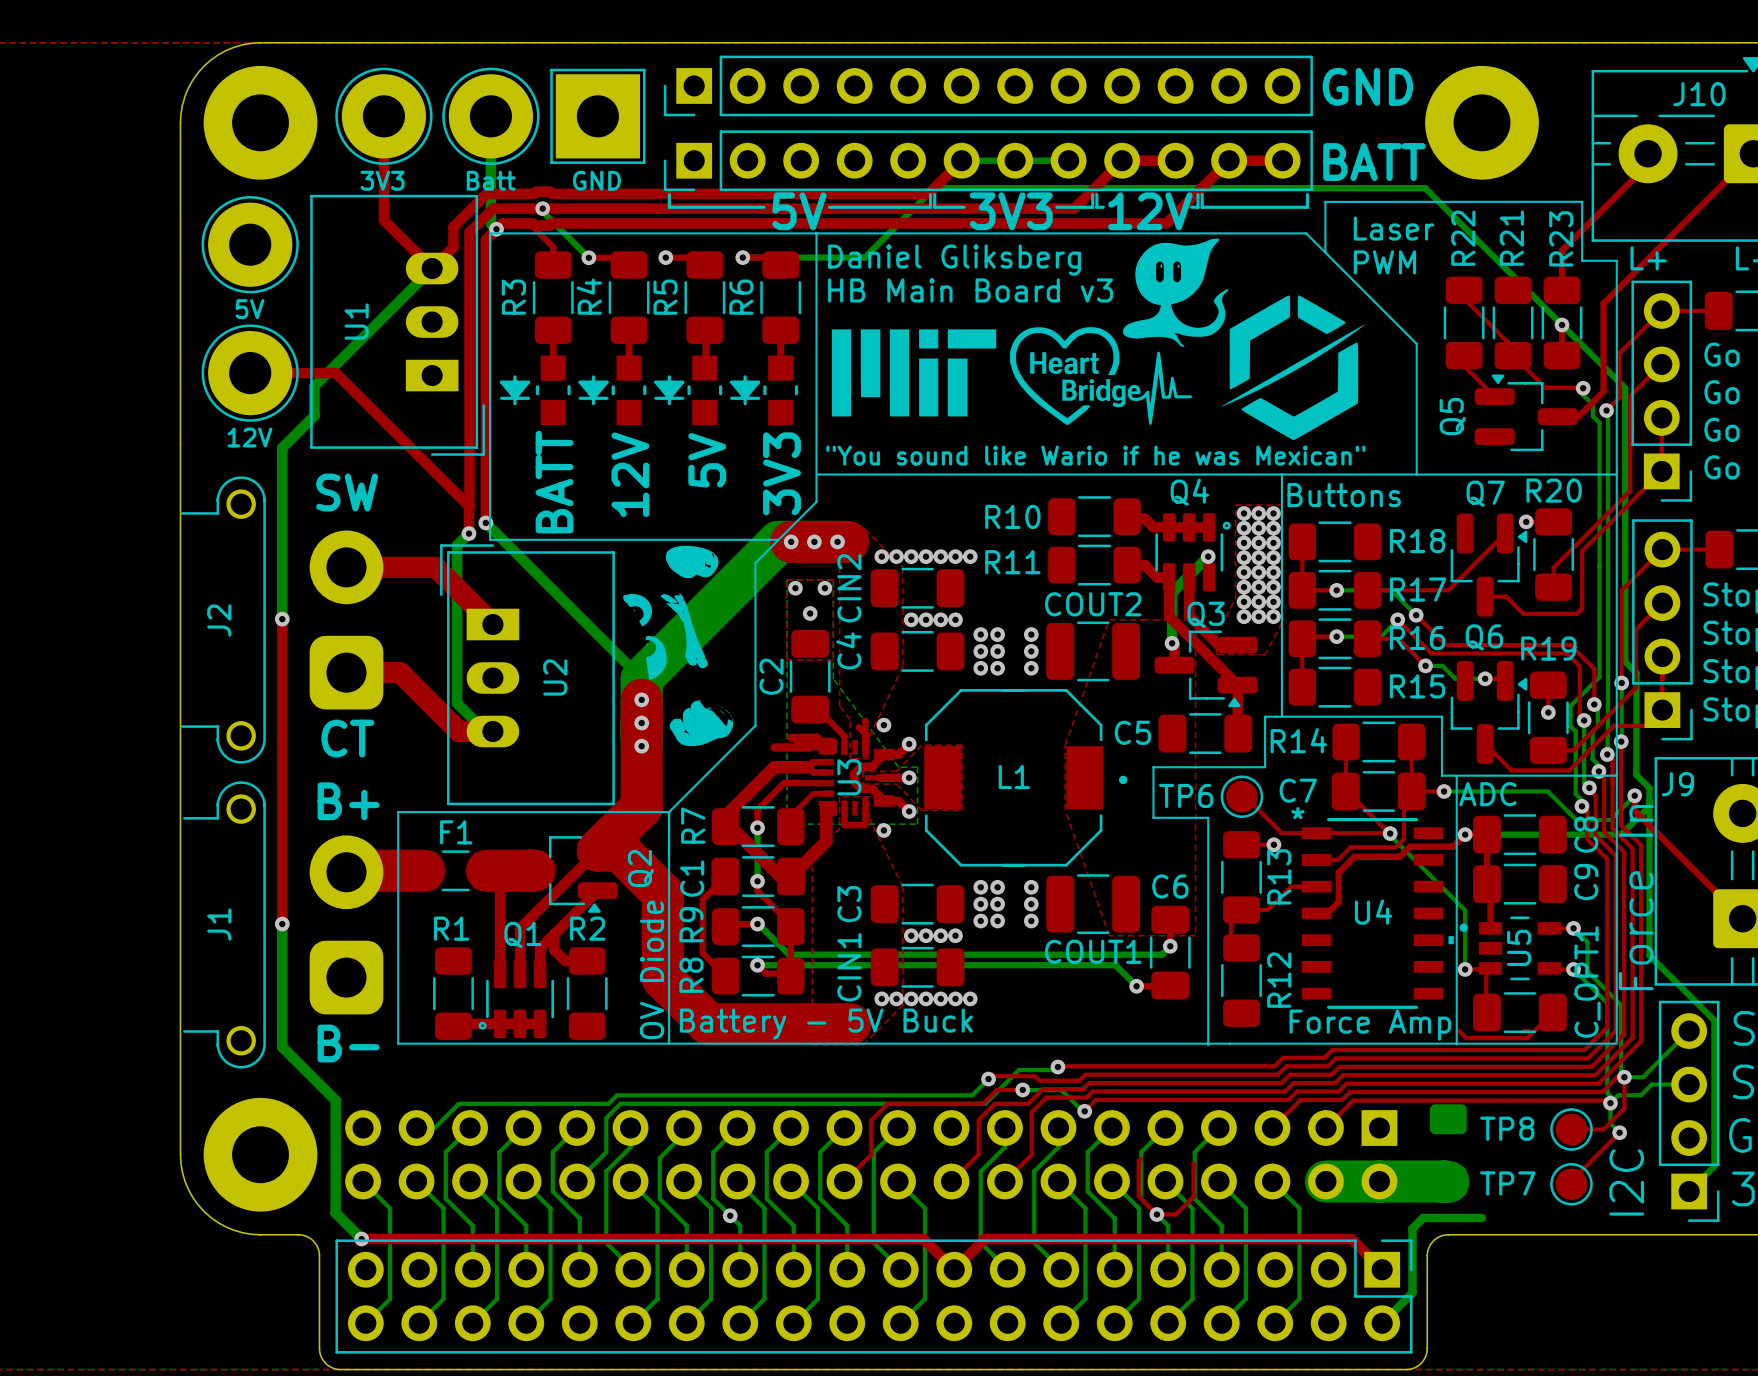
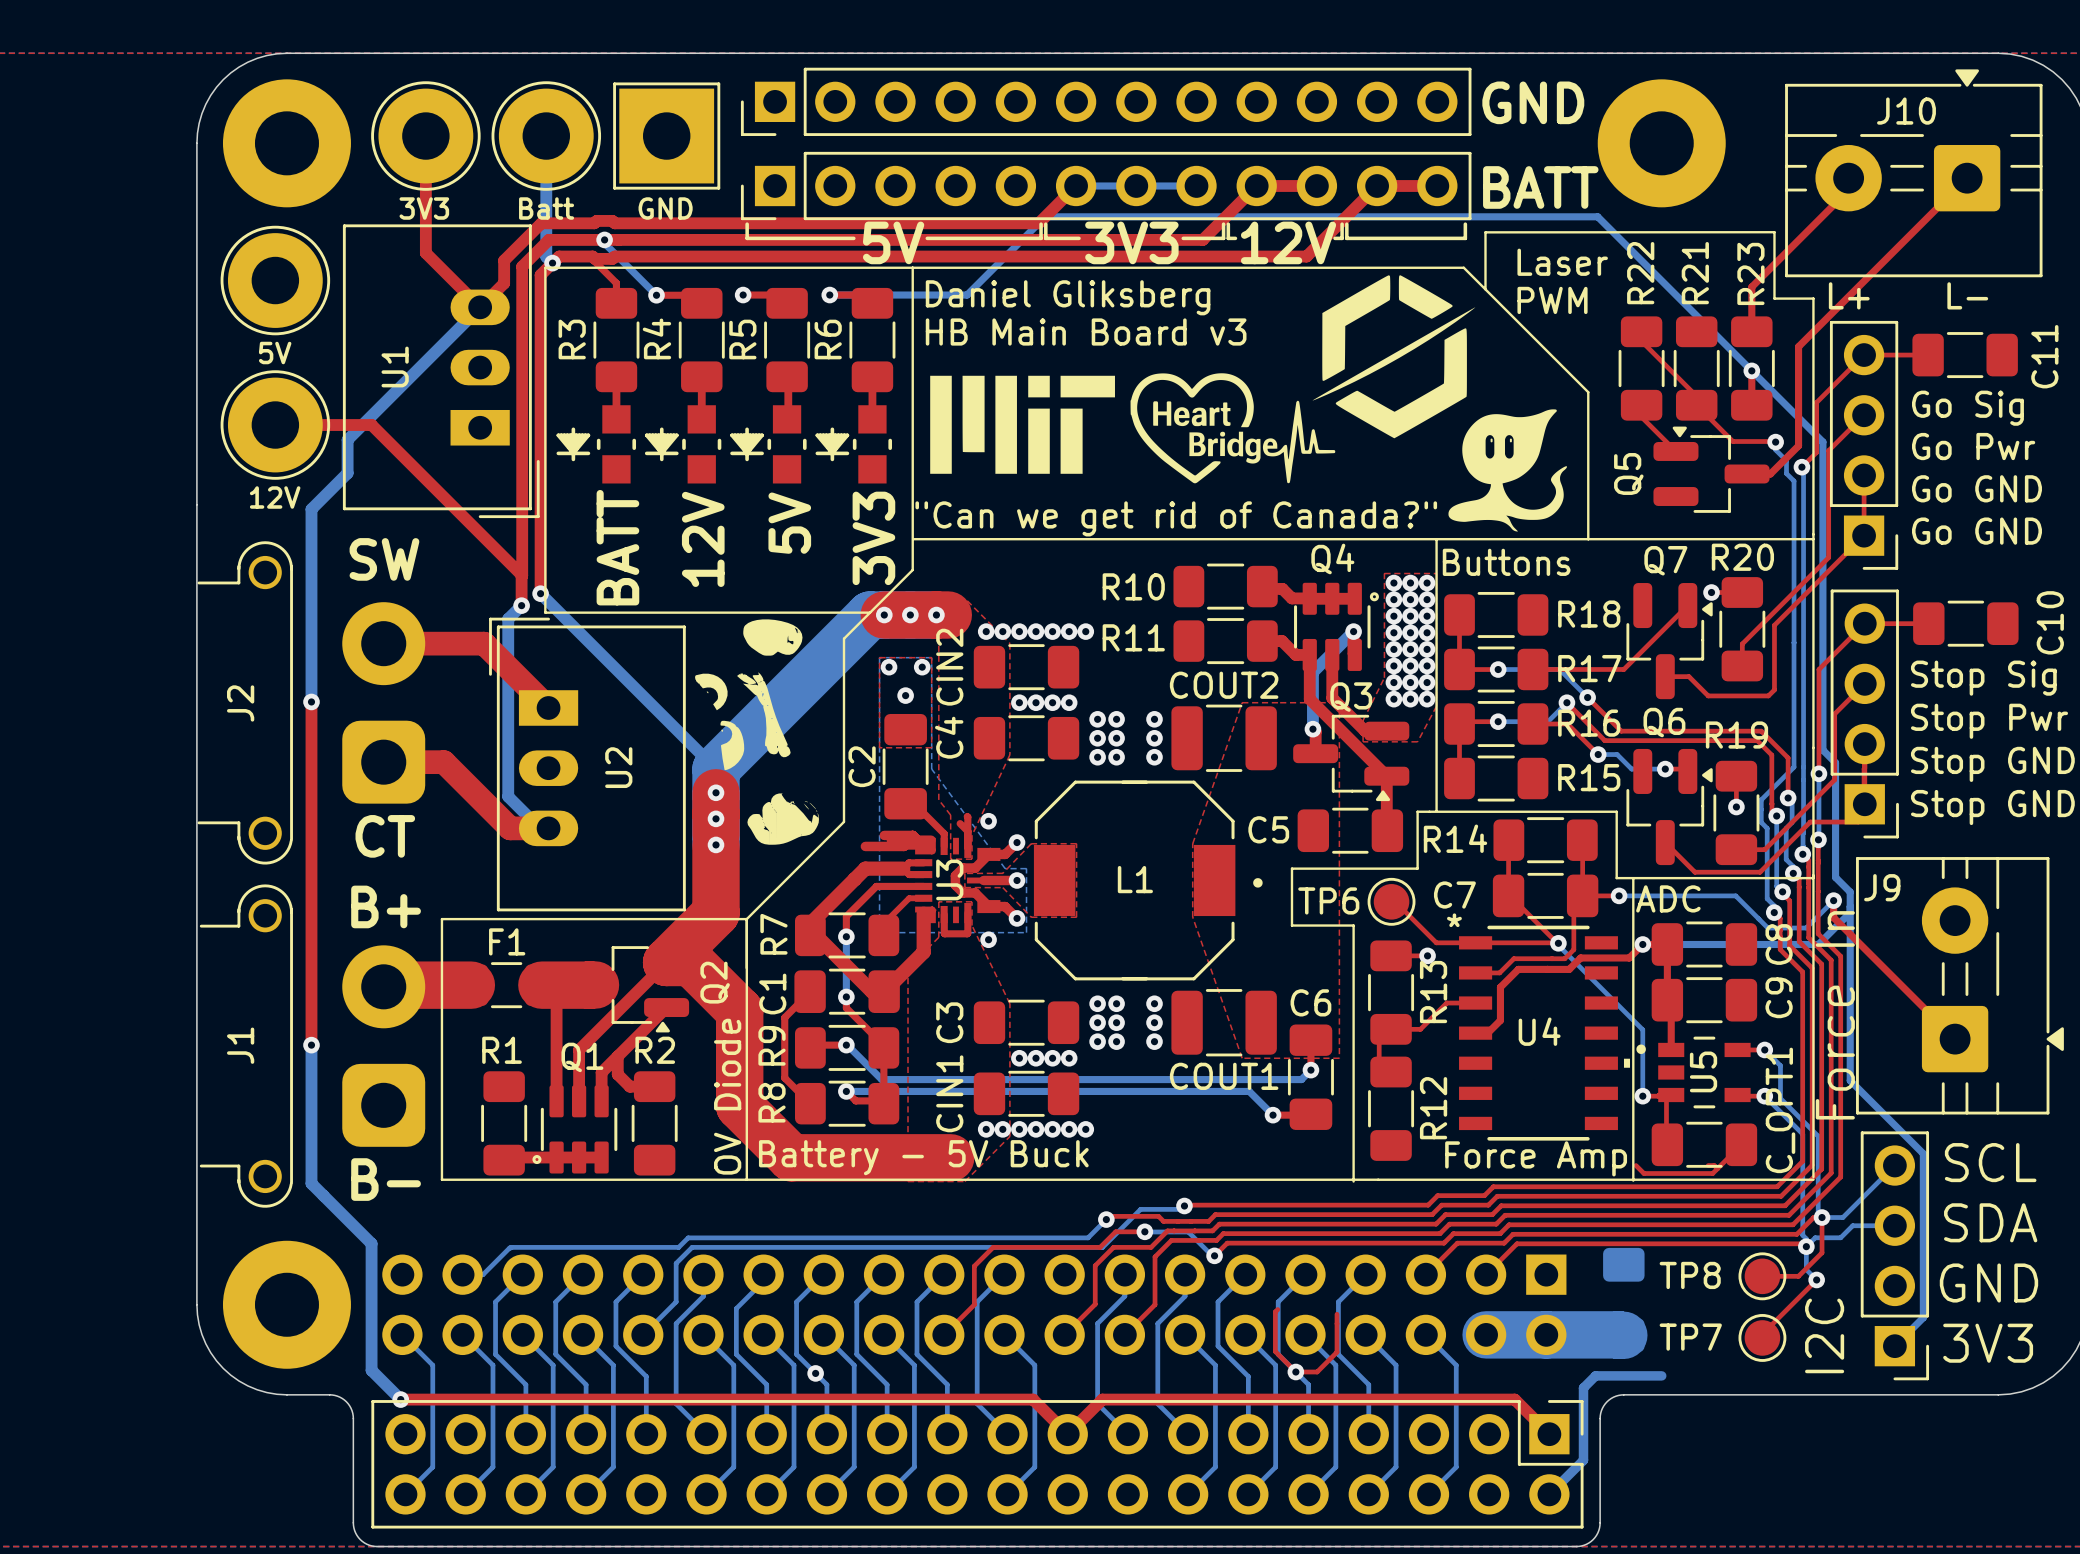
drawing position: (1175, 292) -> (1507, 470)
drawing position: (1293, 367) -> (1393, 356)
text: "You sound like Wario if he was Mexican" (1095, 455) -> "Can we get rid of Canada?" (1176, 518)

